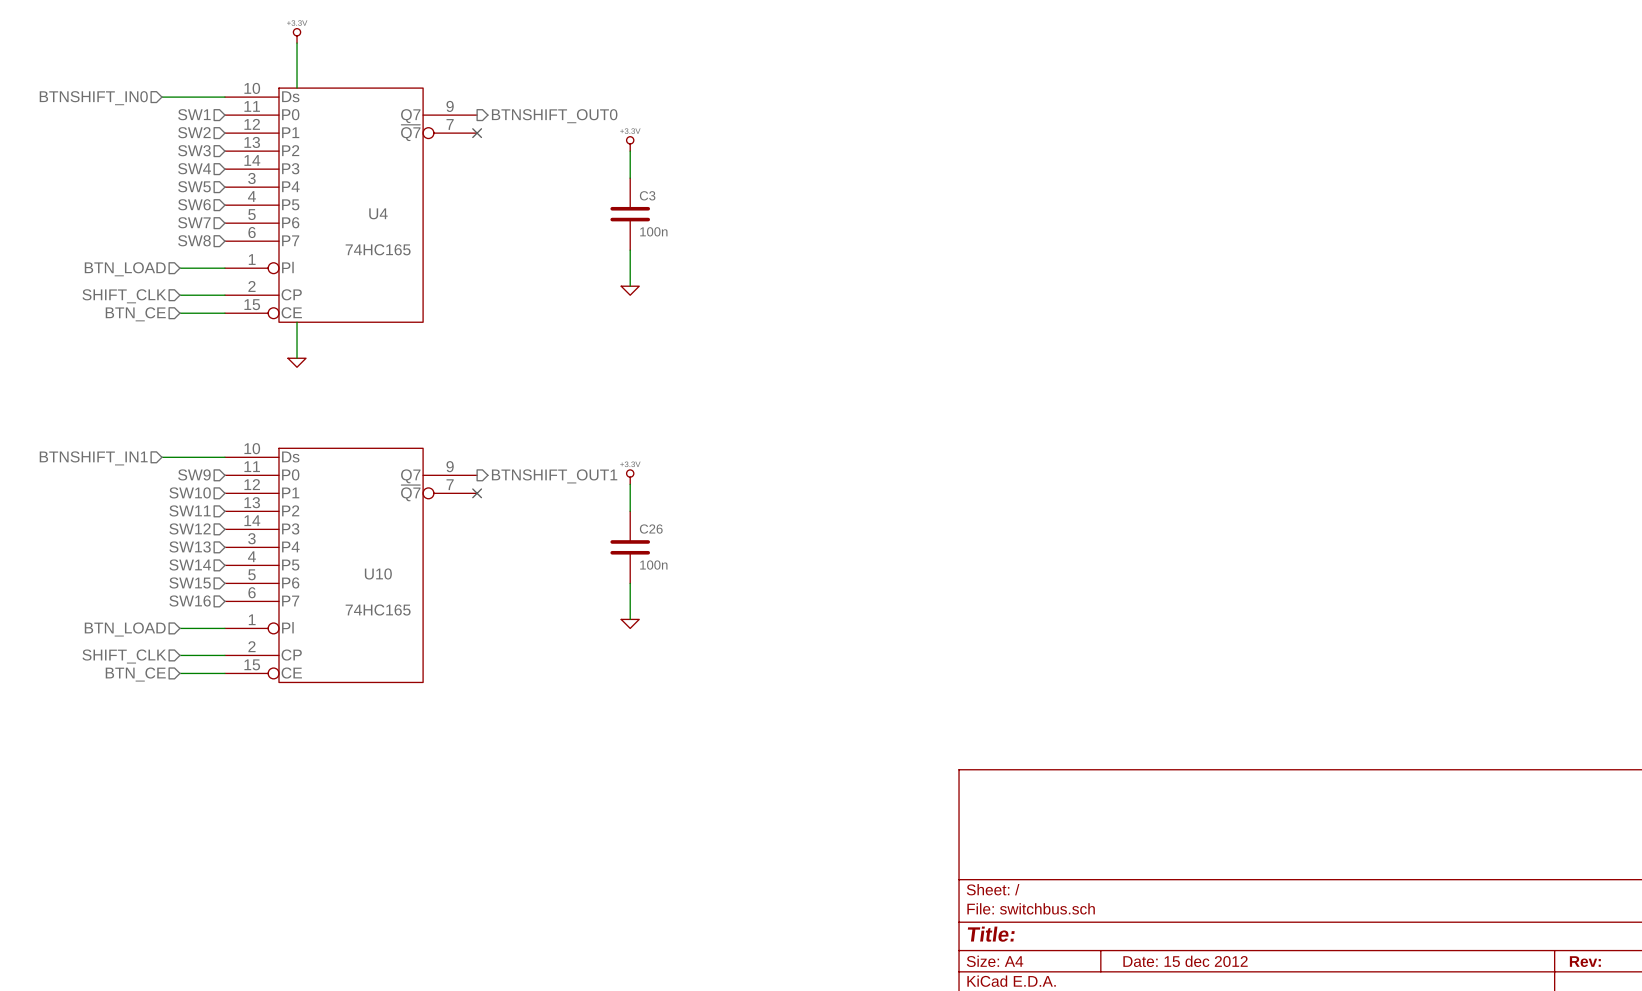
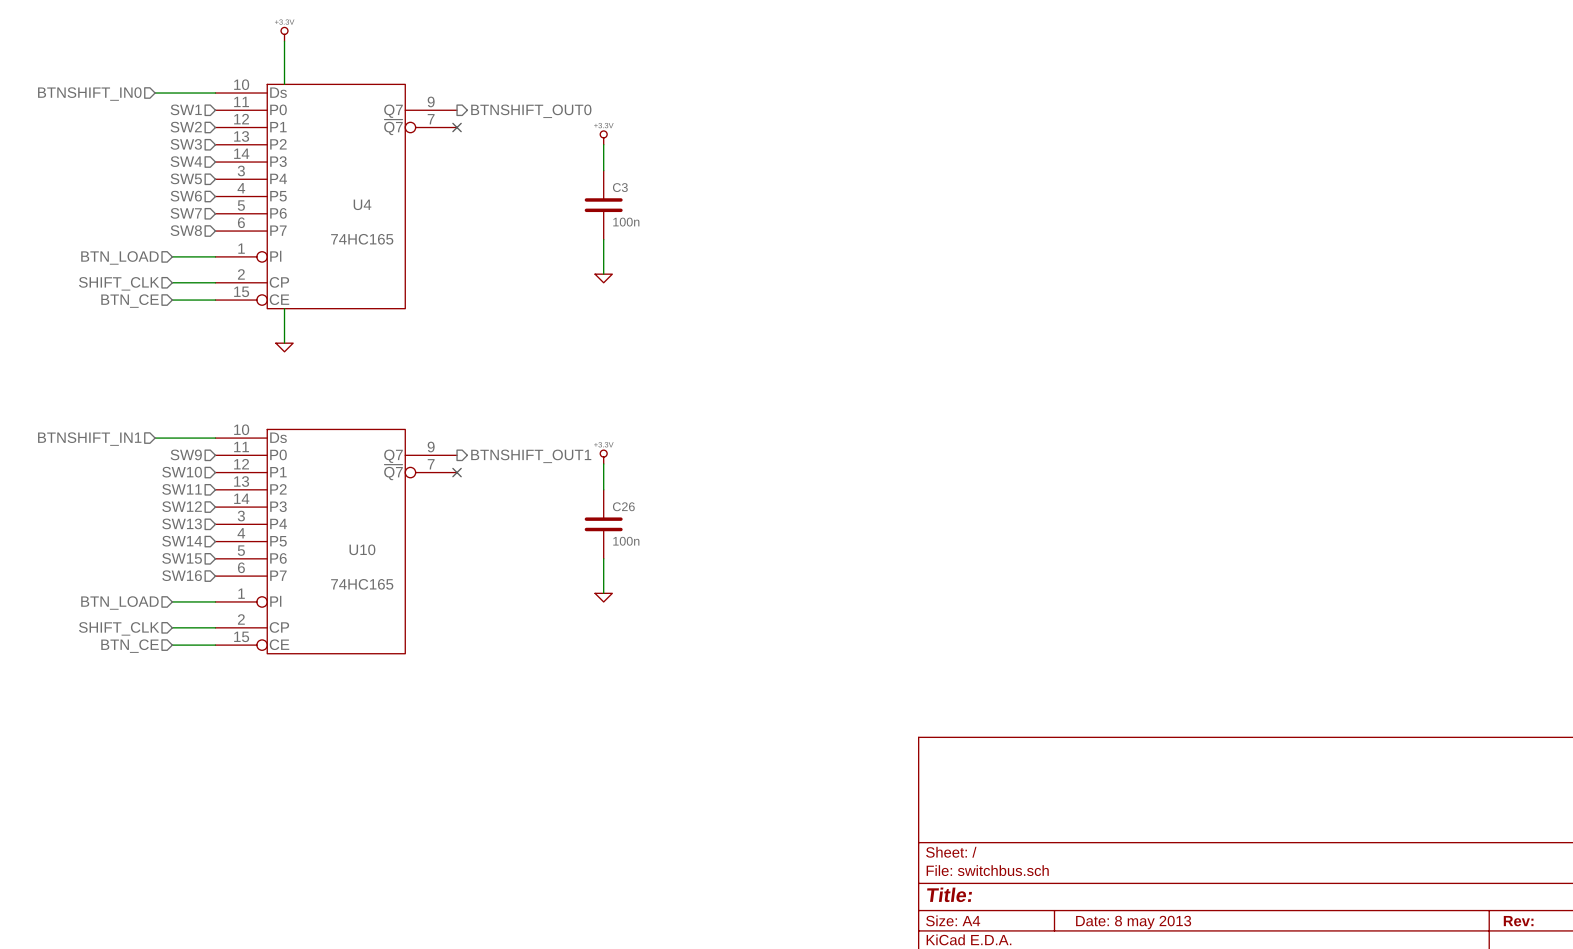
title block: Date: 15 dec 2012 (1185, 961) -> Date: 8 may 2013 (1133, 922)

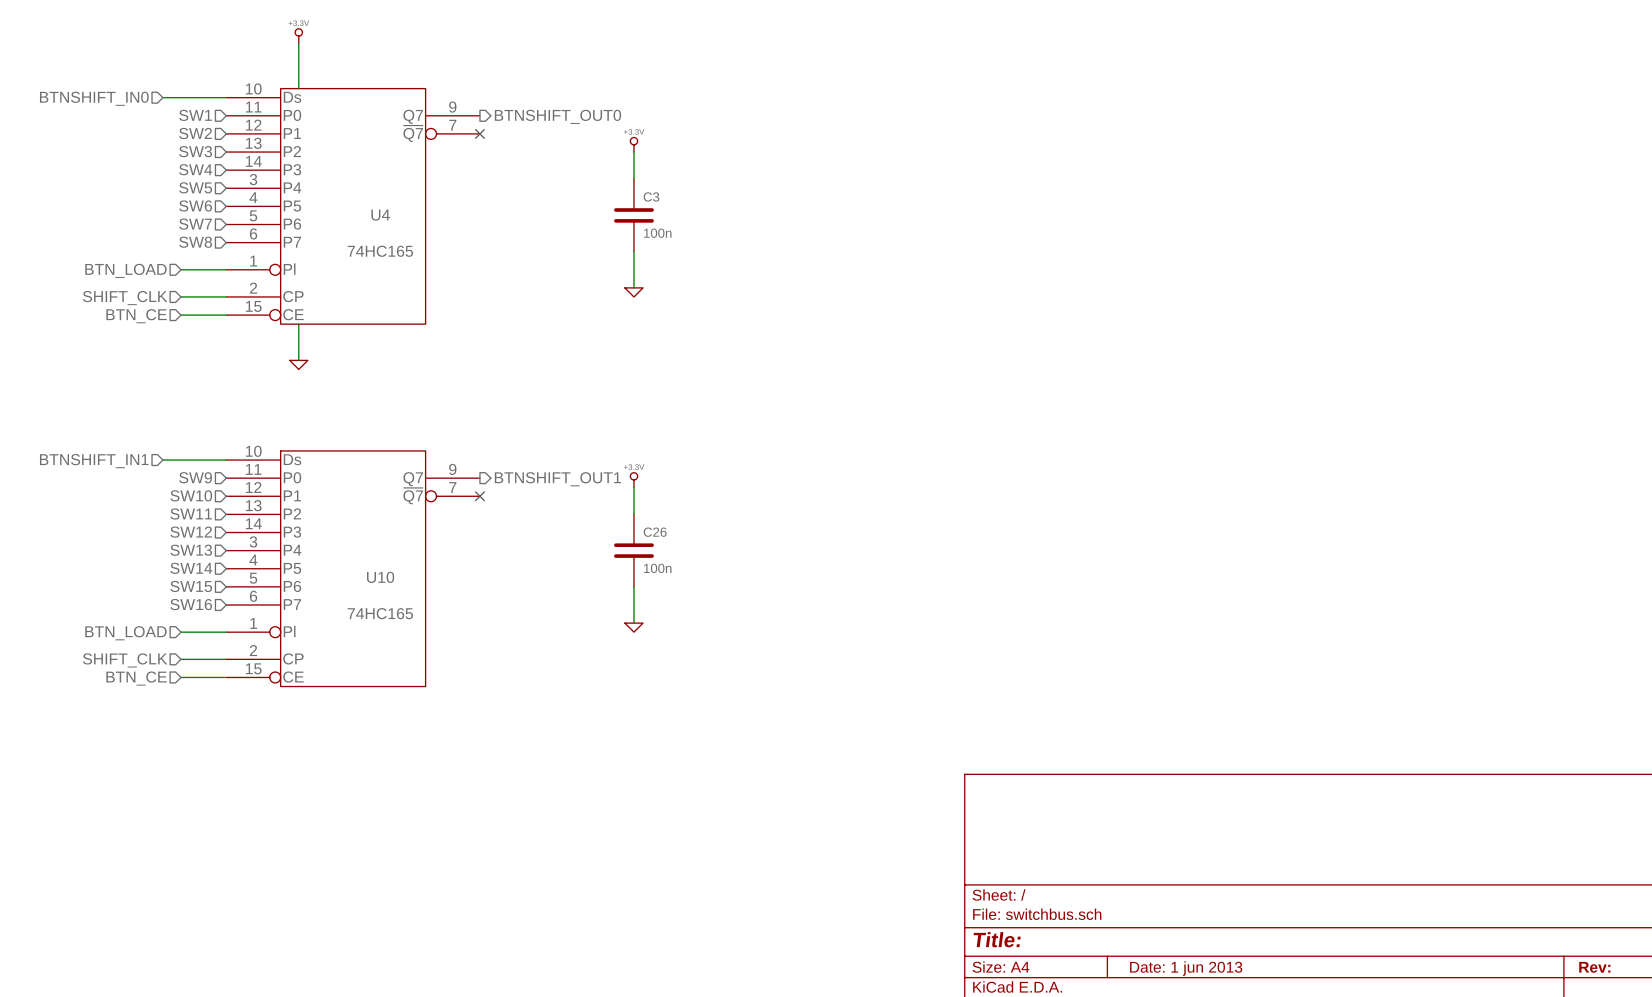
title block: Date: 8 may 2013 (1133, 922) -> Date: 1 jun 2013 (1186, 968)

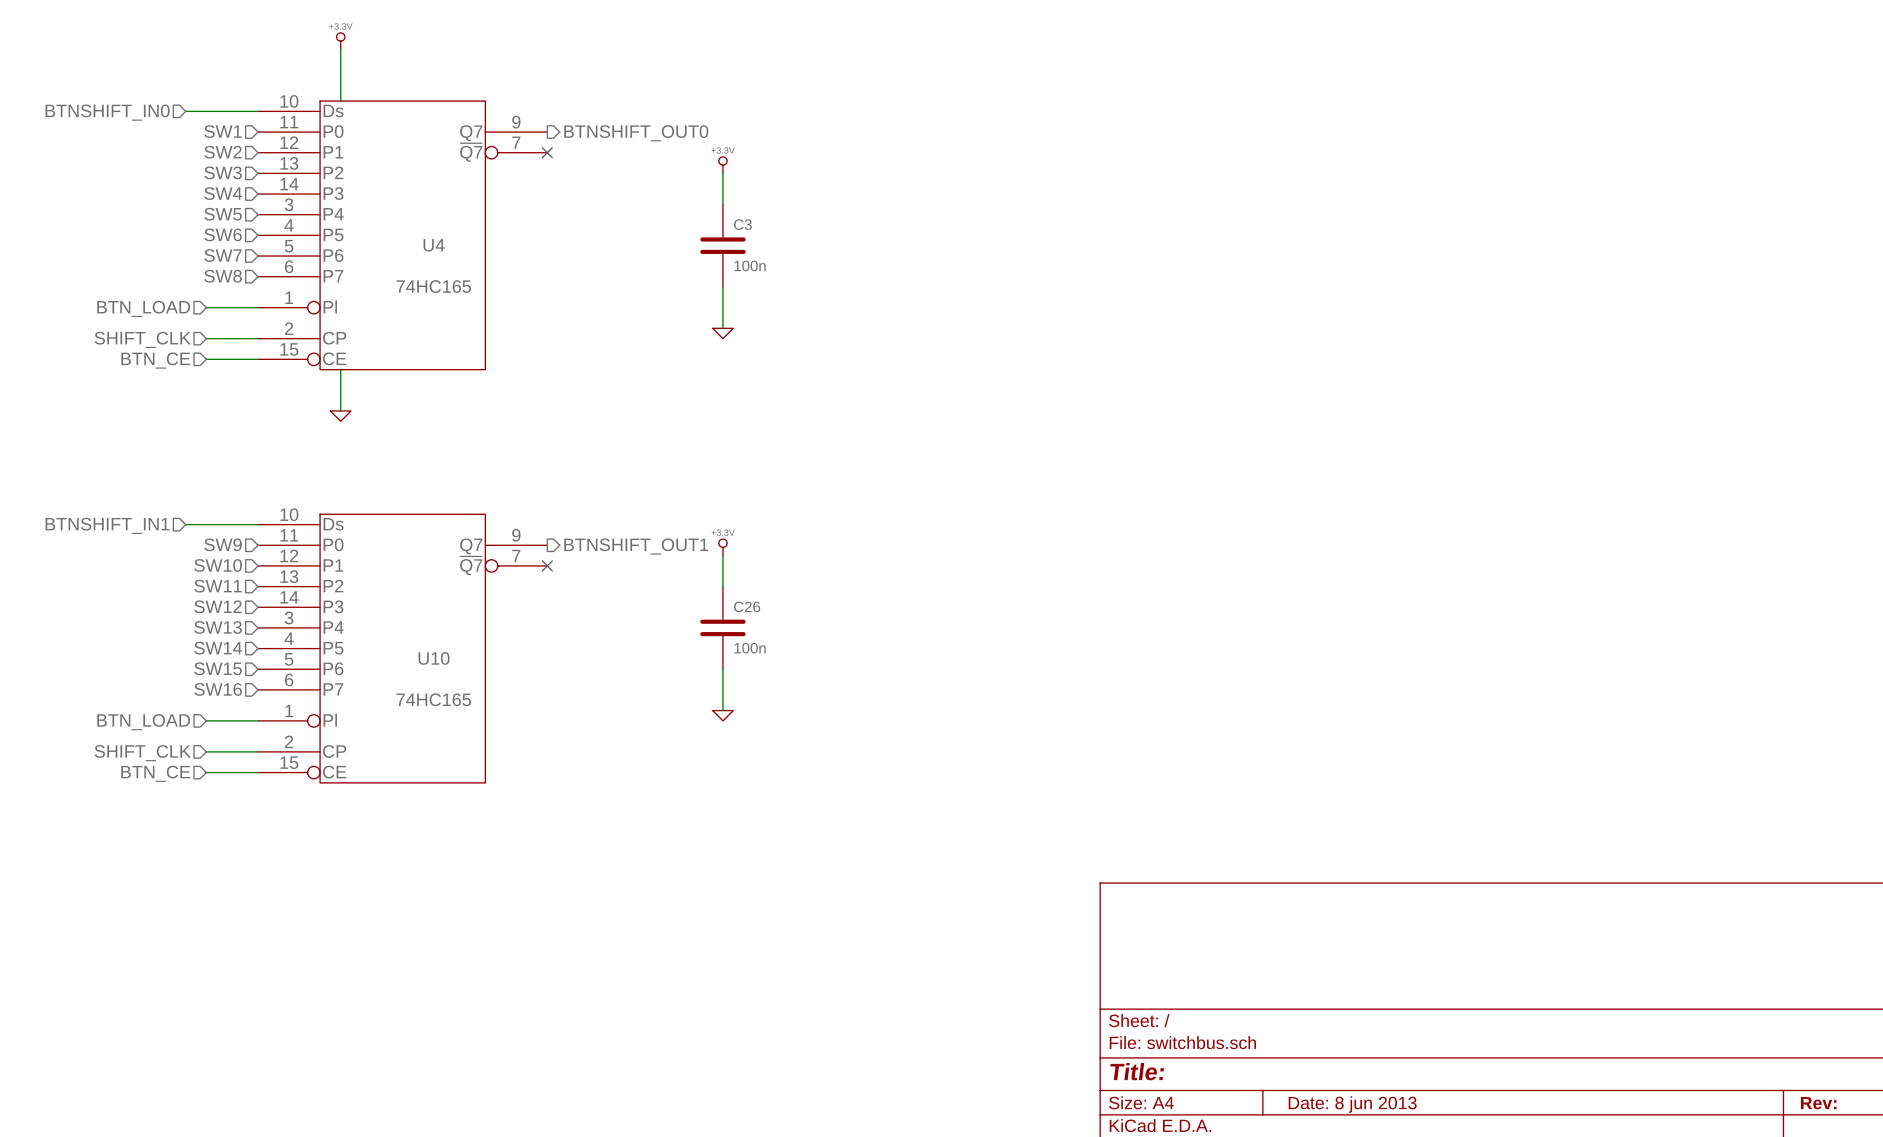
title block: Date: 1 jun 2013 (1186, 968) -> Date: 8 jun 2013 (1352, 1104)

